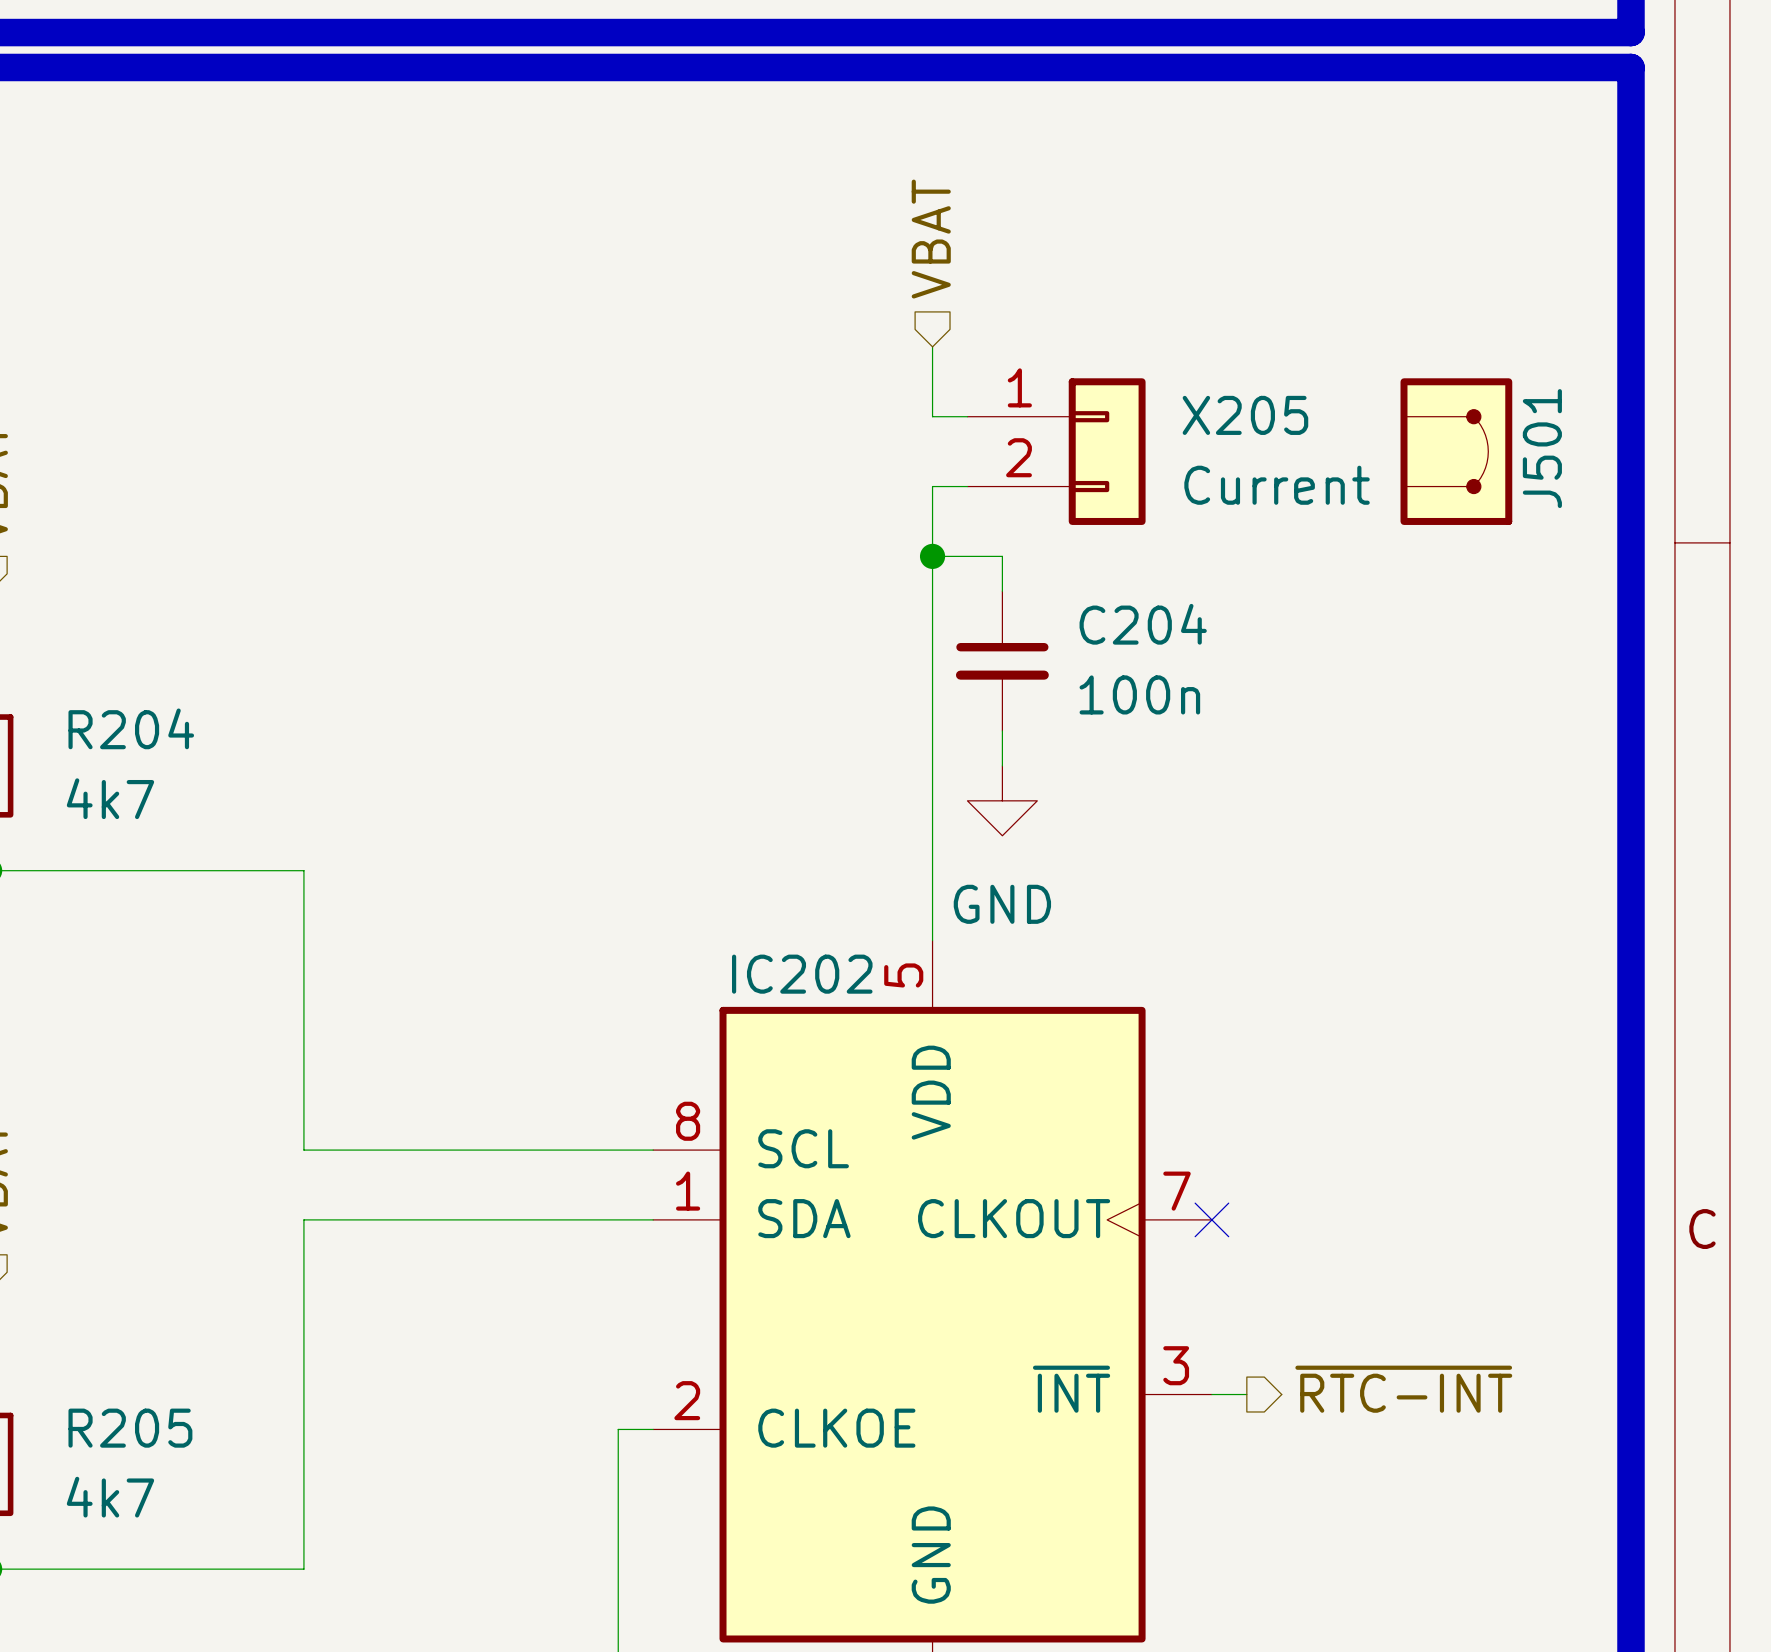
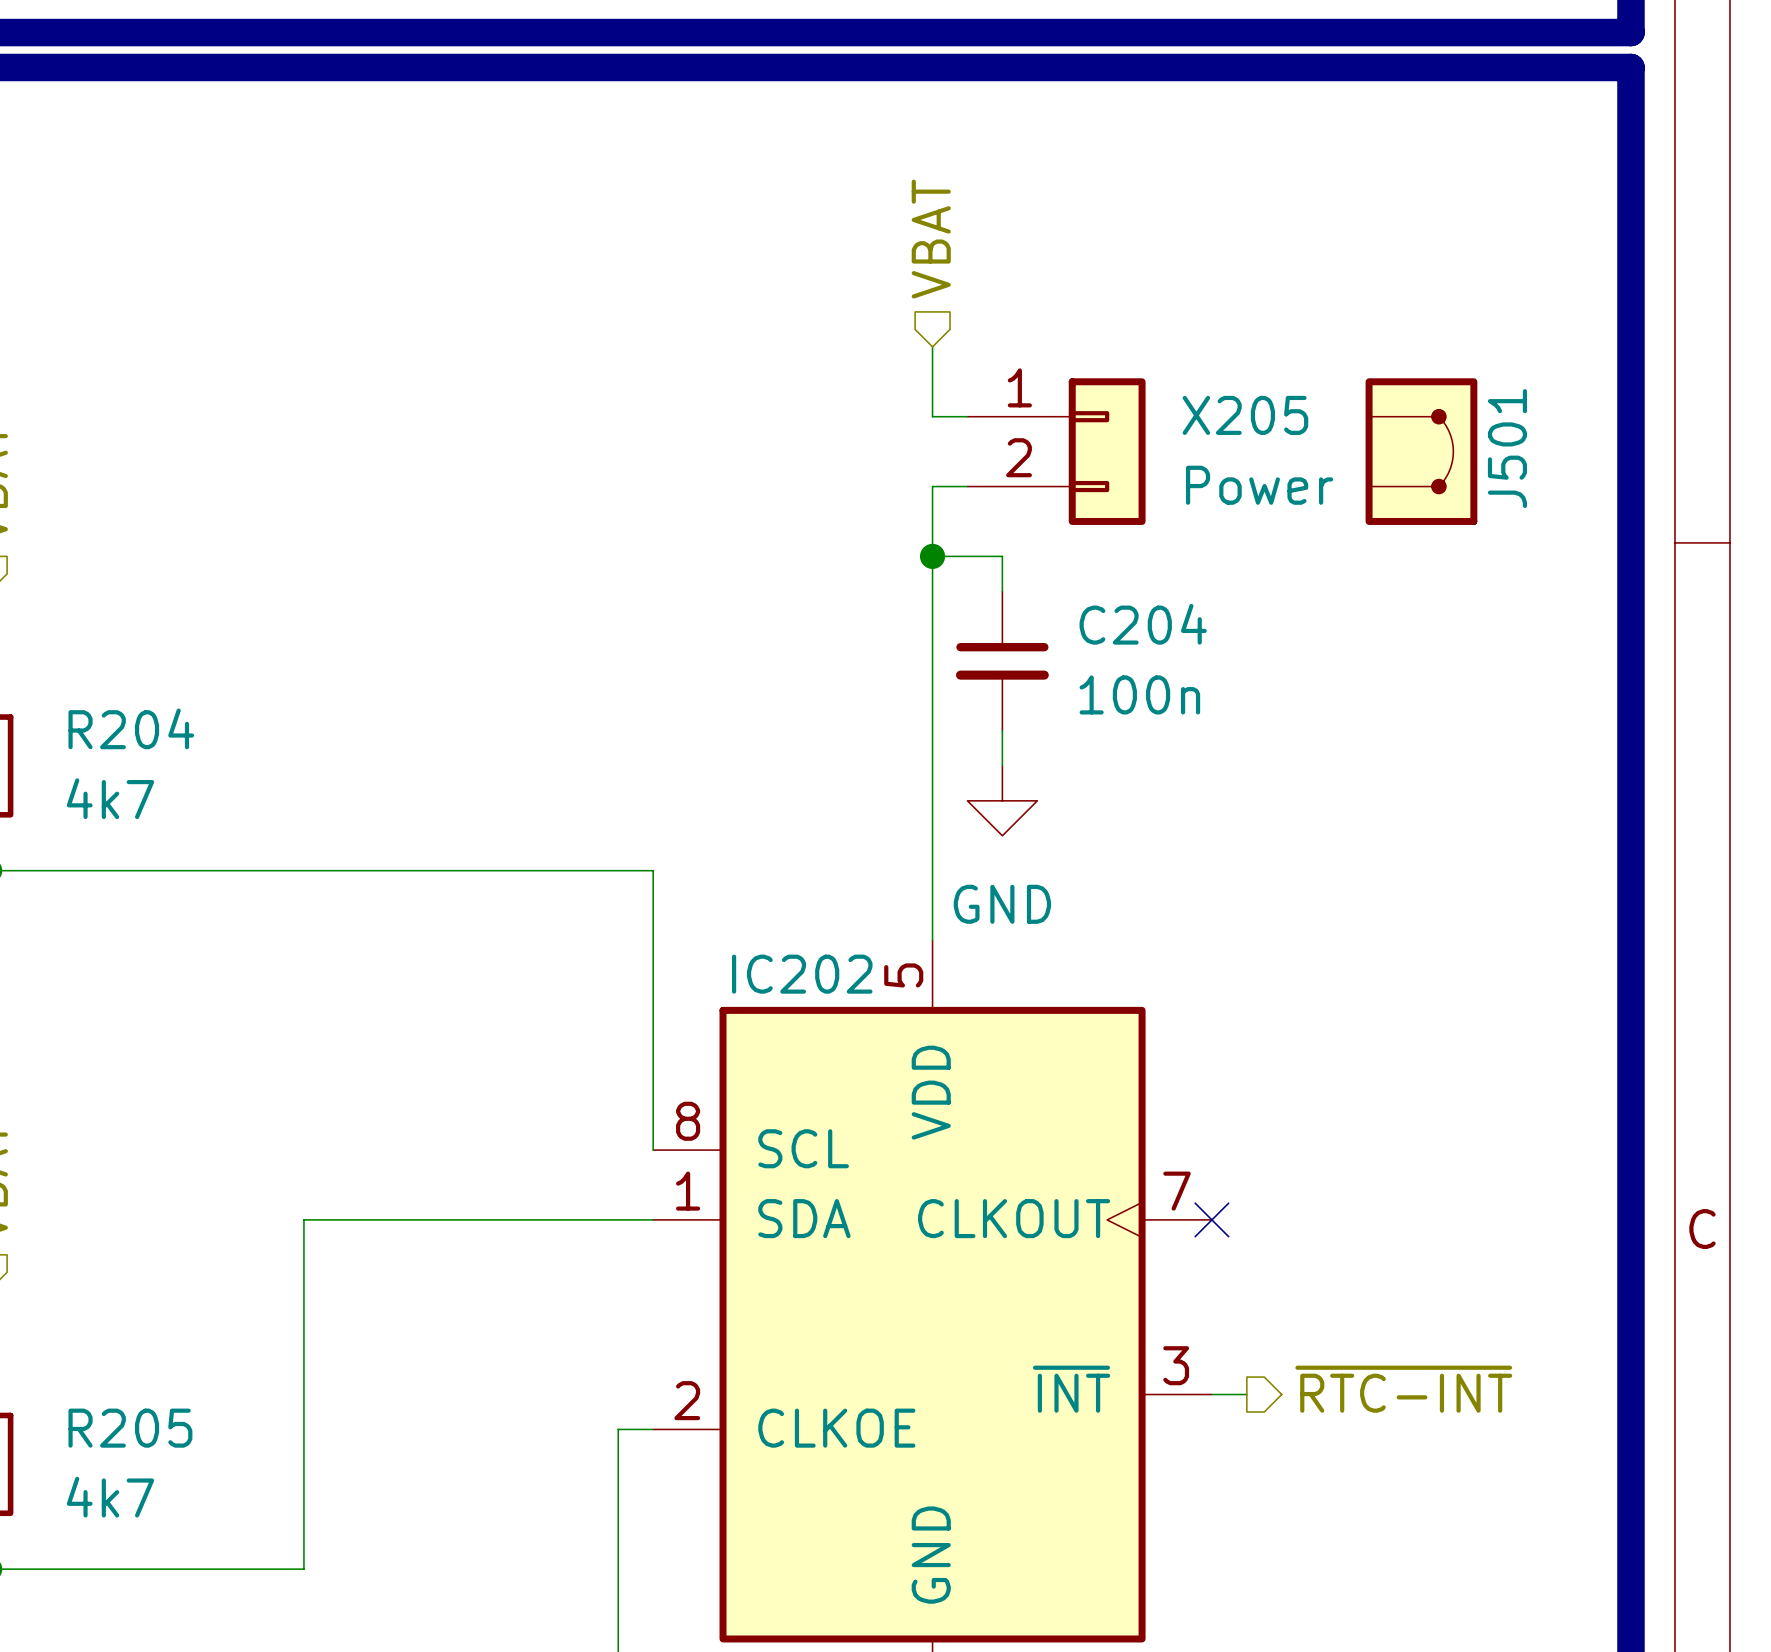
J501 position: (1456, 451) -> (1421, 451)
X205 value: Current (1277, 485) -> Power (1259, 485)
wire: (303, 870) (303, 1150) (653, 1150) -> (303, 870) (653, 870) (653, 1150)

